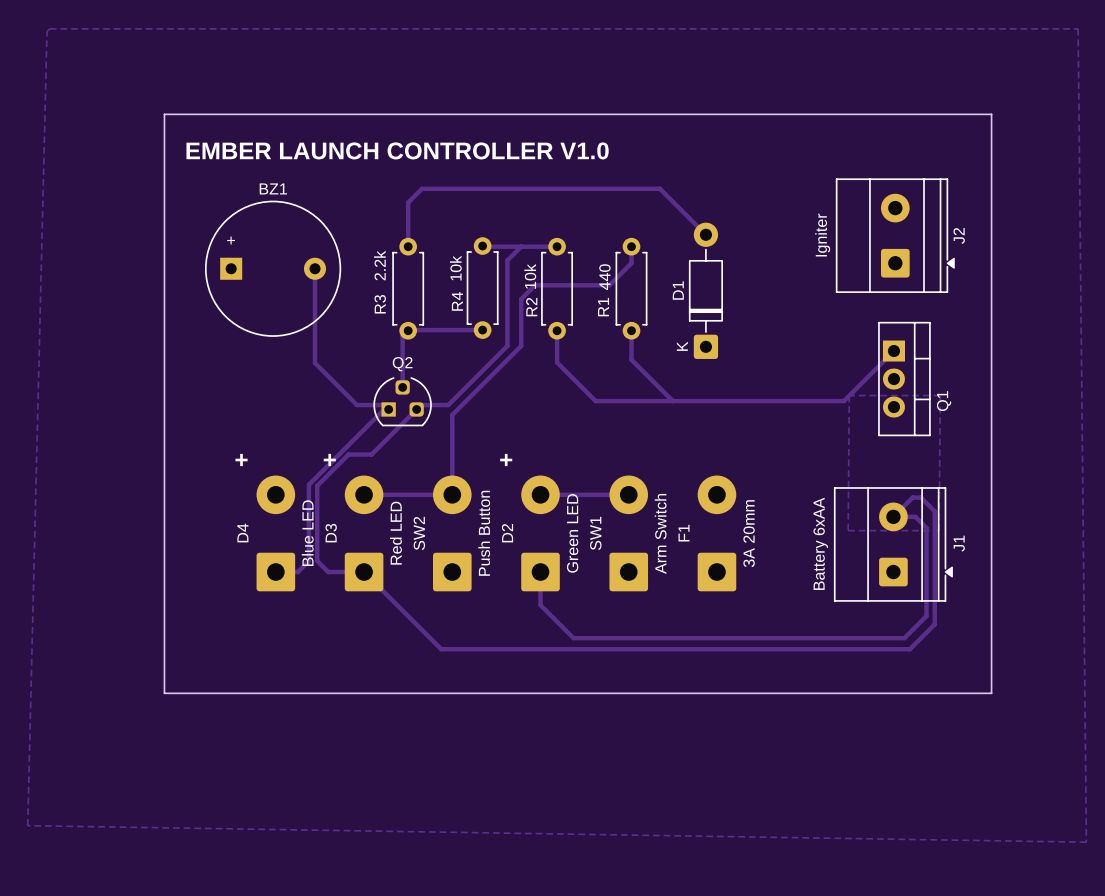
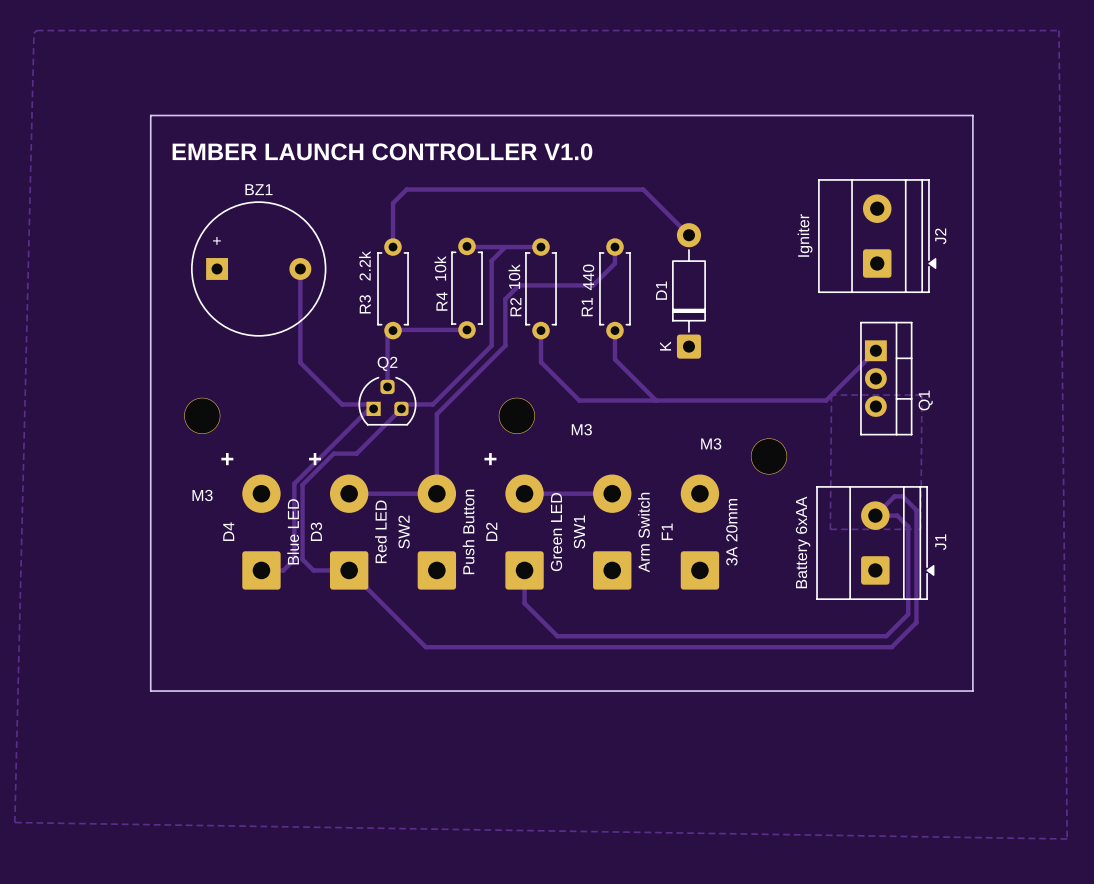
M3: none -> (202, 415)
M3: none -> (516, 415)
M3: none -> (769, 456)

